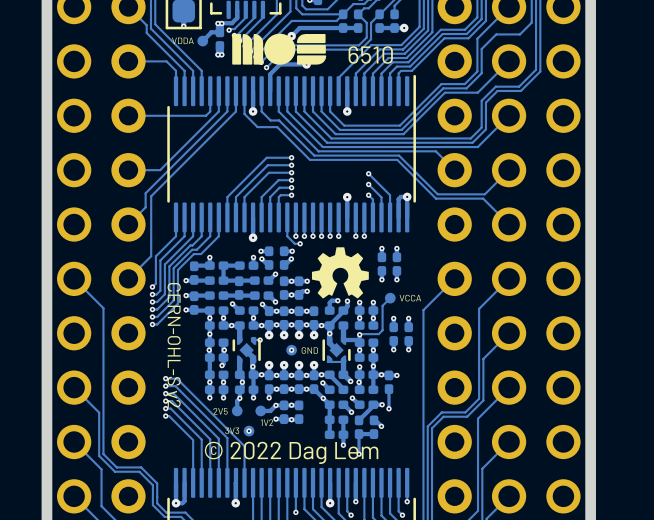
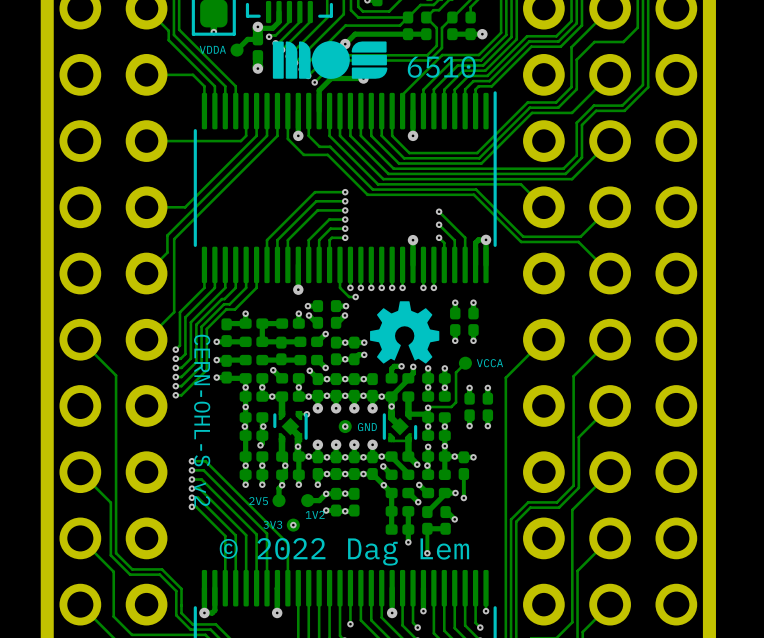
via: none -> (257, 26)
via: (217, 23) -> none
via: (221, 23) -> none
via: (217, 54) -> none
via: (221, 54) -> none
via: none -> (257, 68)

